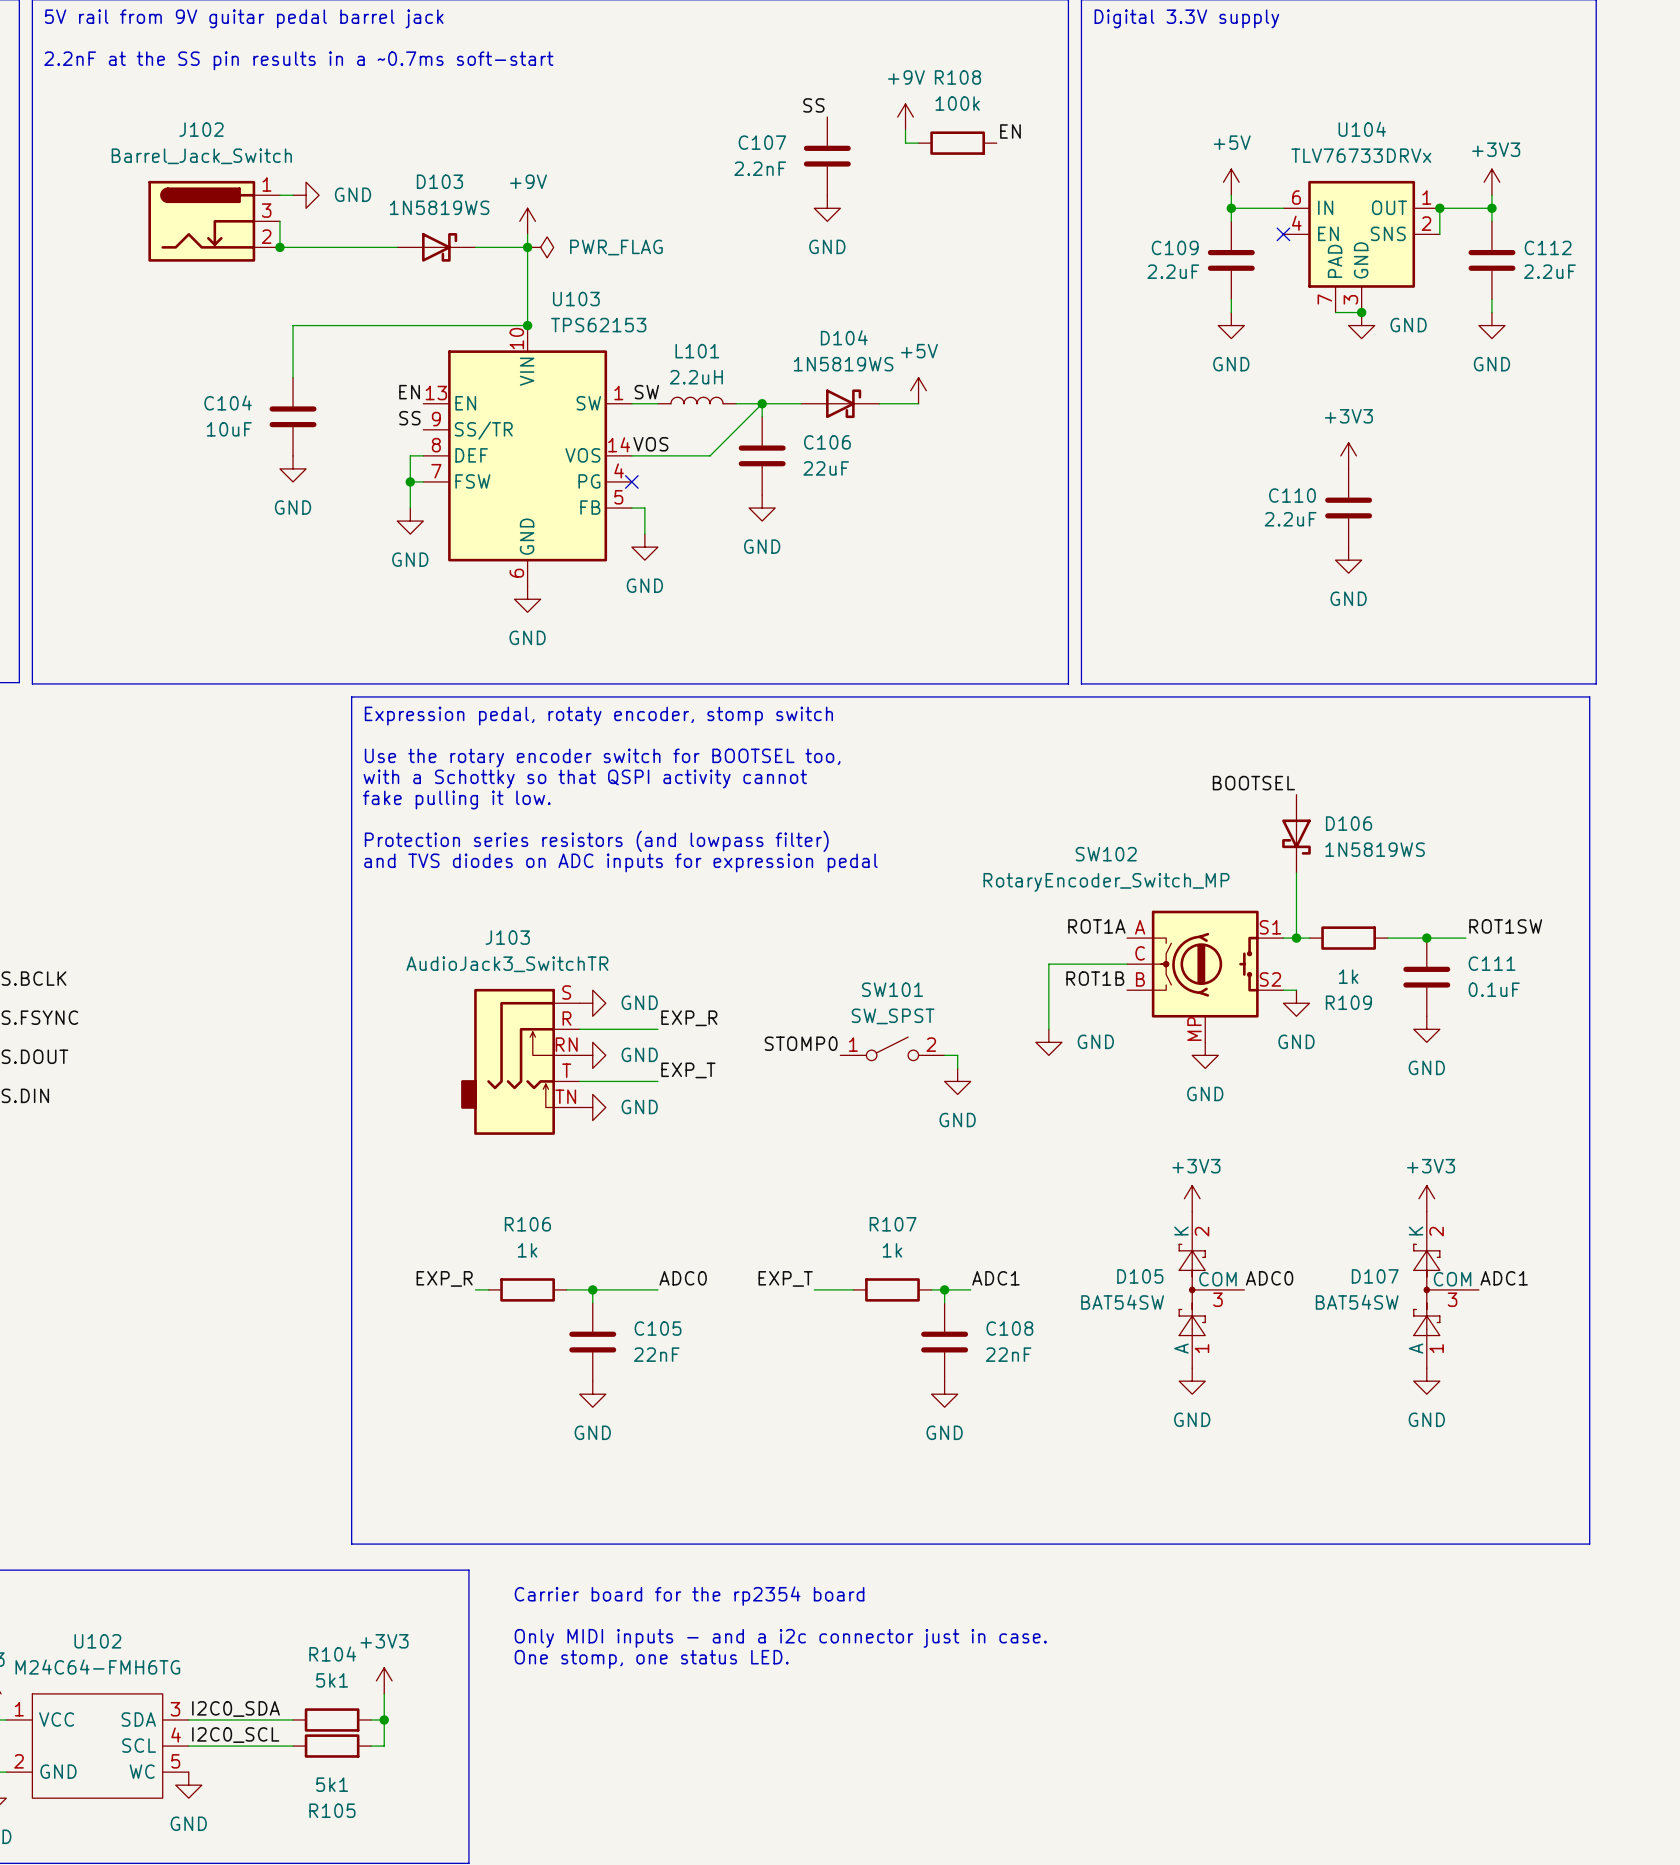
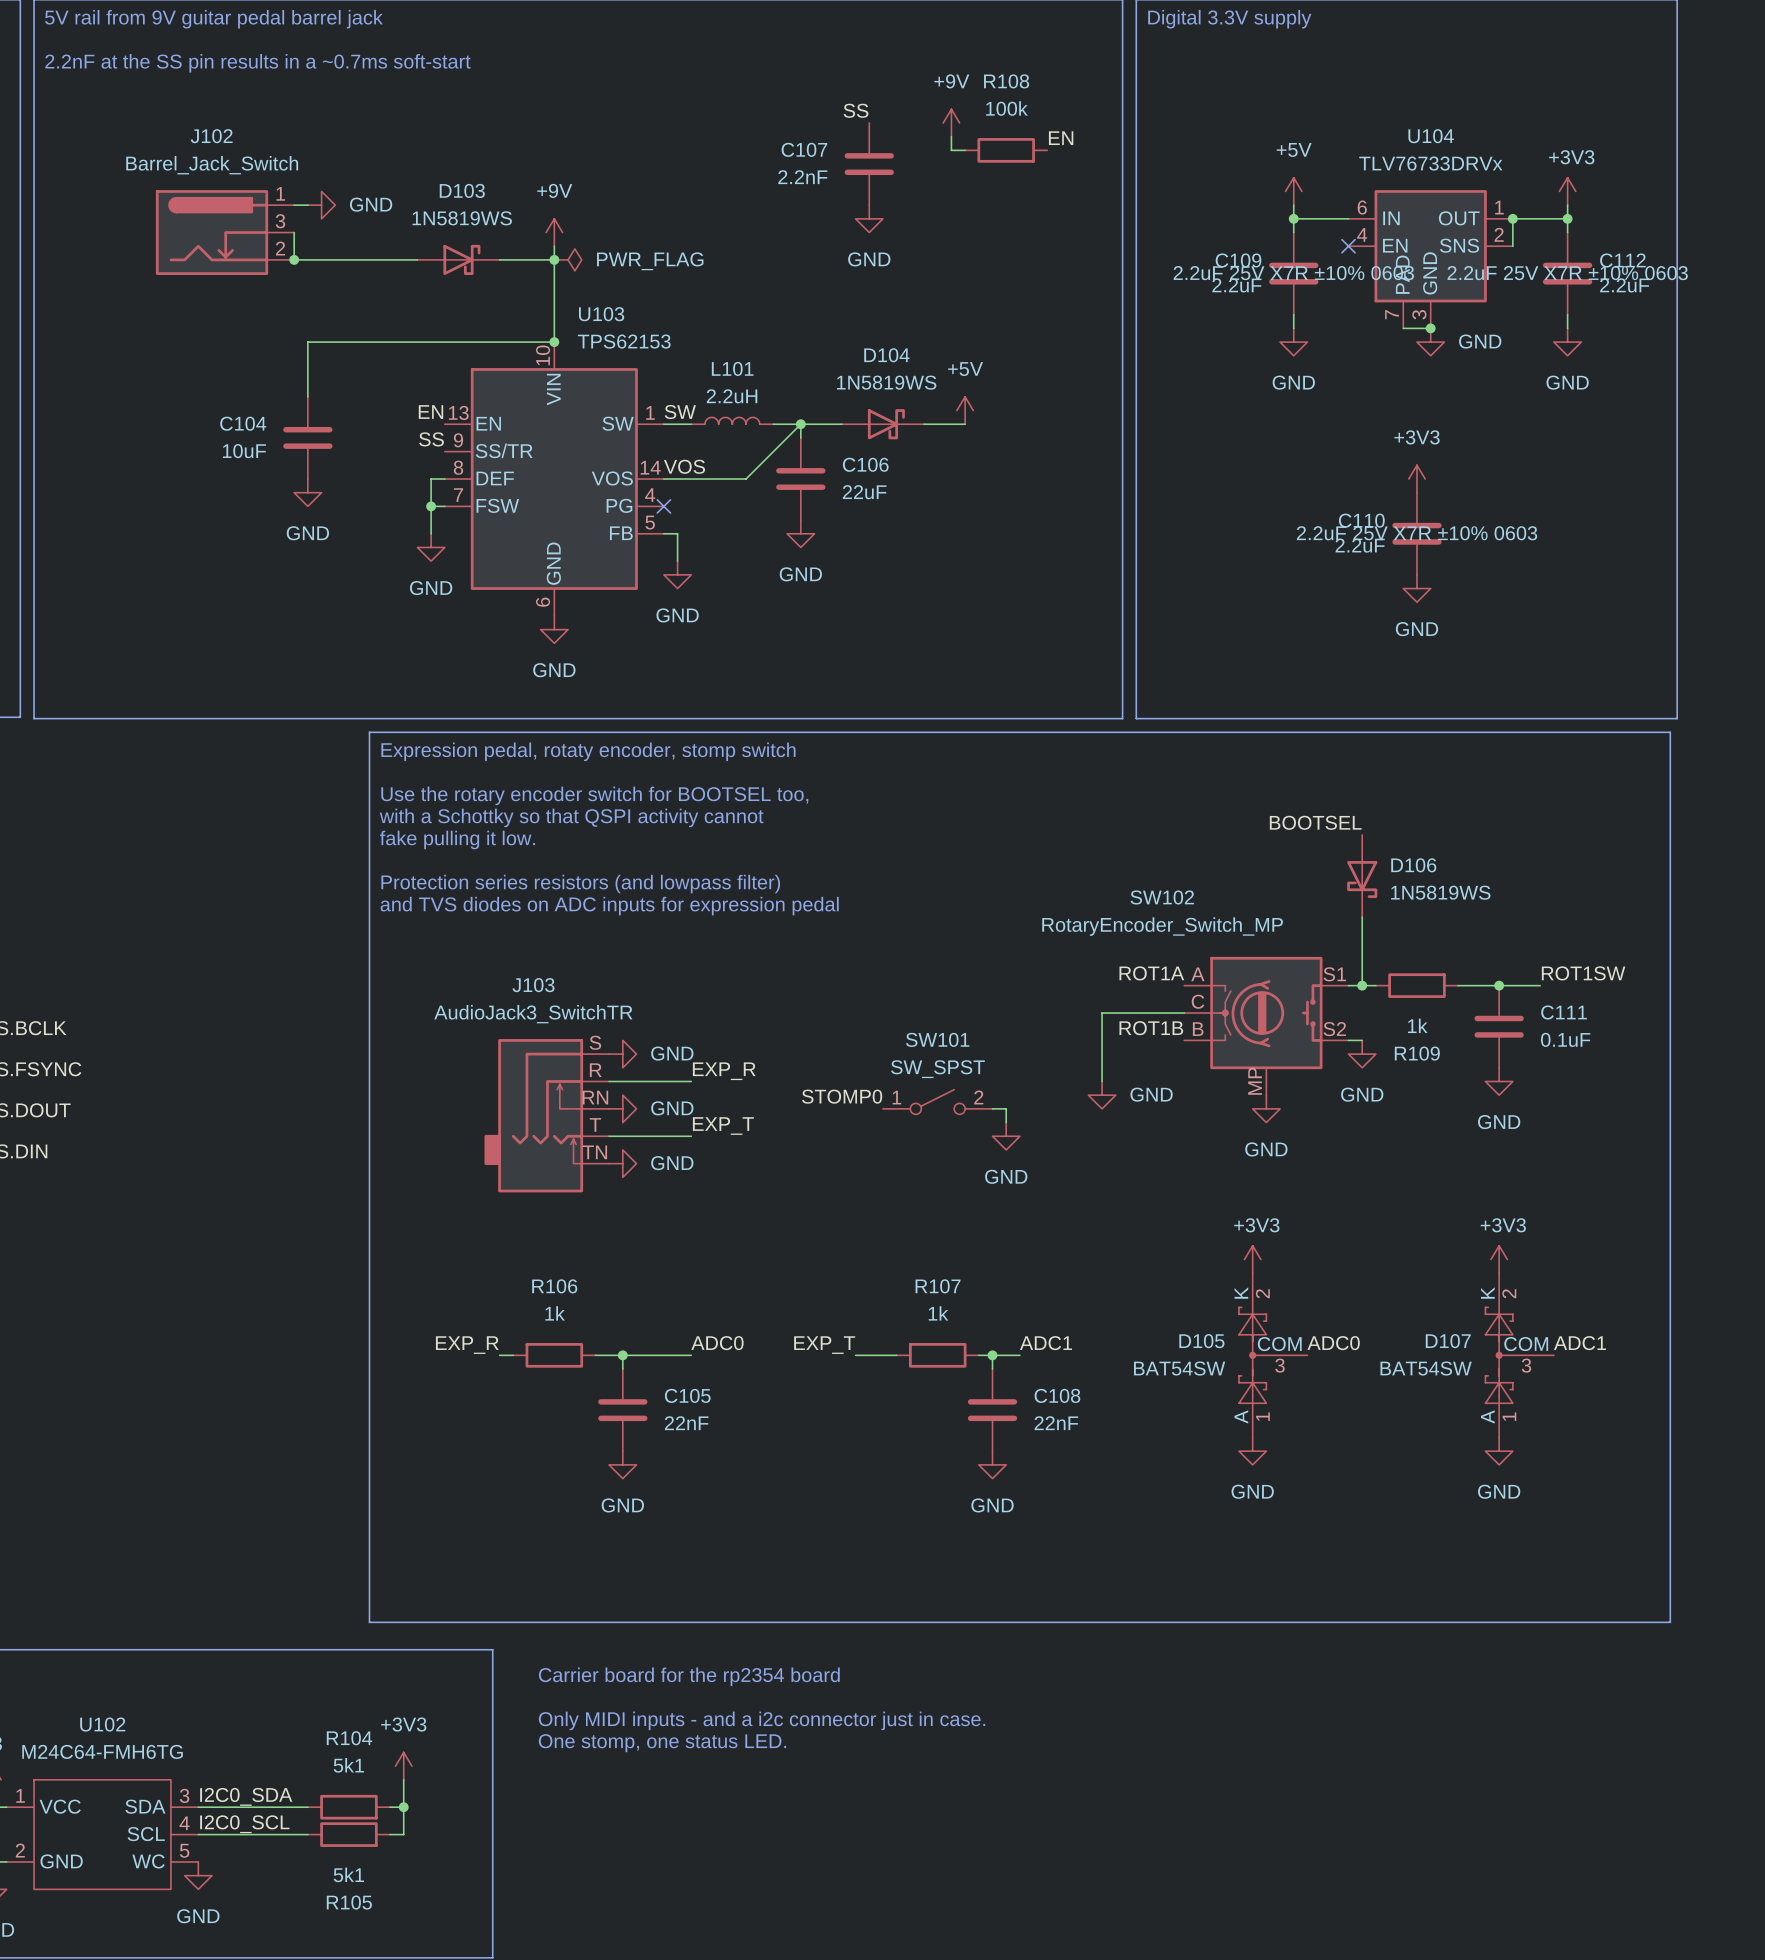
C109 text: none -> 2.2uF 25V X7R ±10% 0603 (1293, 273)
C112 text: none -> 2.2uF 25V X7R ±10% 0603 (1567, 273)
C110 text: none -> 2.2uF 25V X7R ±10% 0603 (1417, 533)

